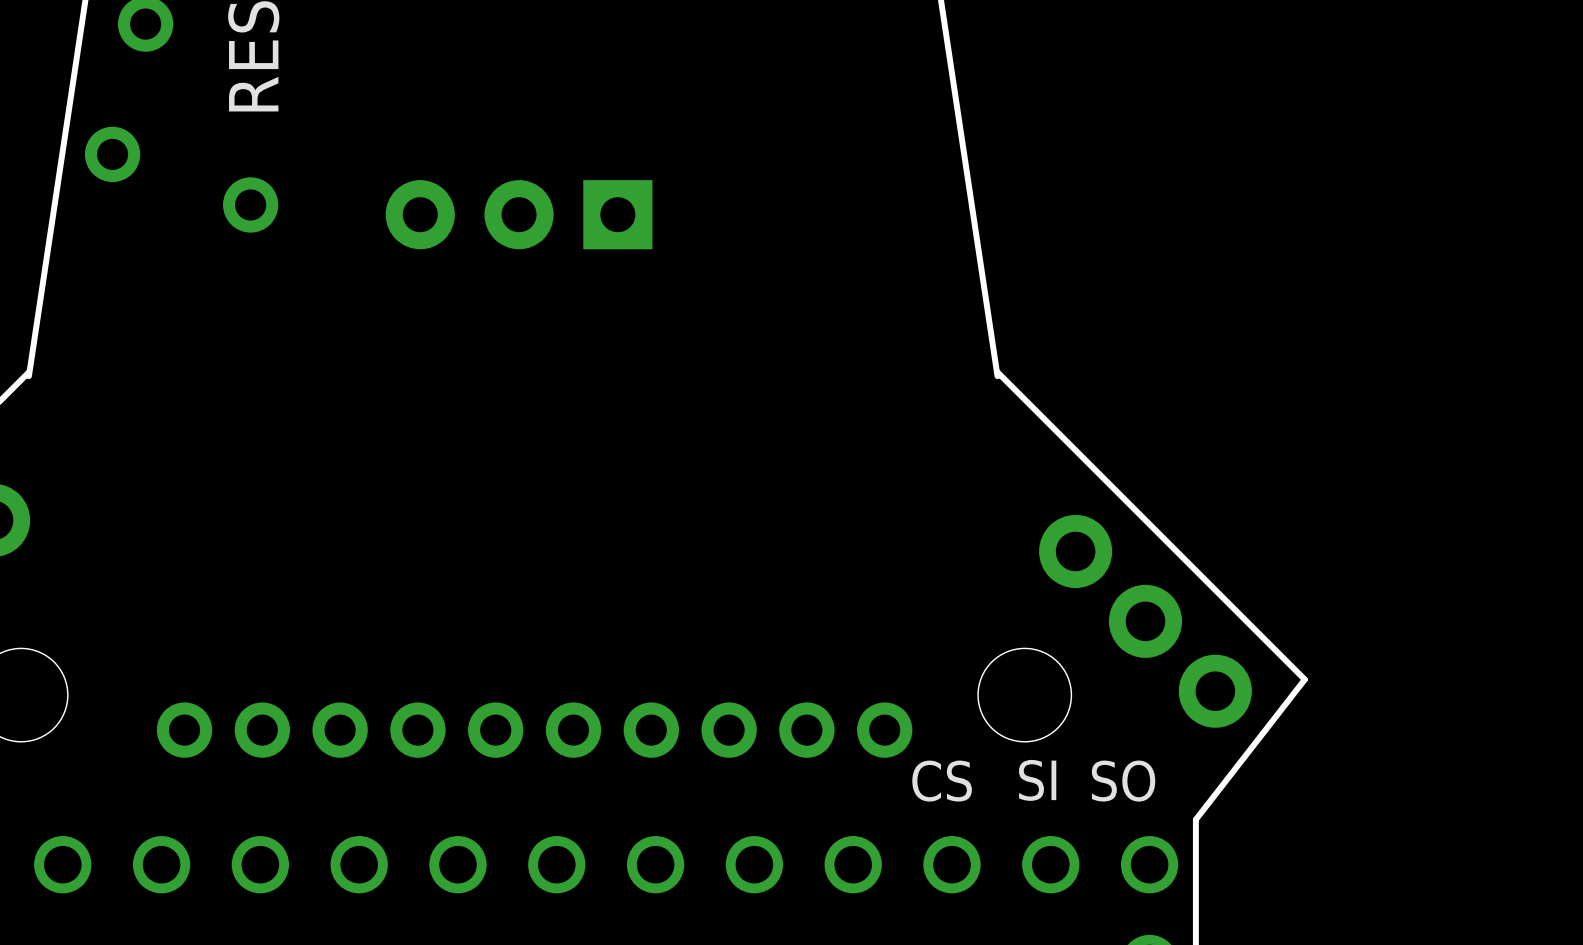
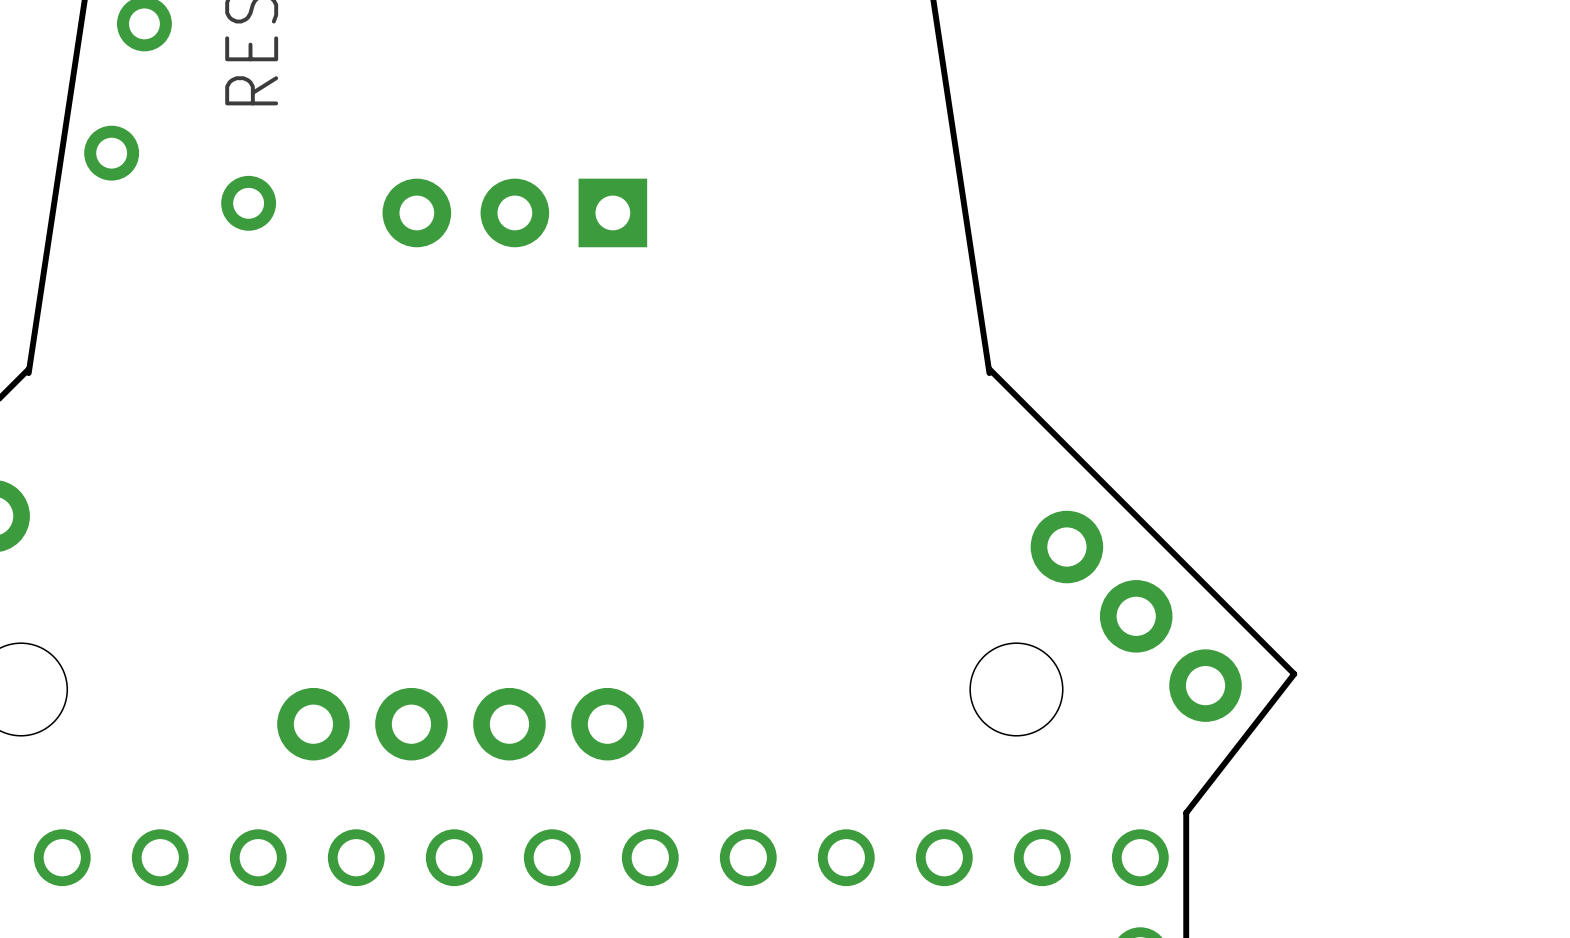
part: none -> (460, 724)
part: (534, 730) -> none
text: SI (1037, 780) -> none
text: CS (942, 781) -> none
text: SO (1123, 781) -> none

